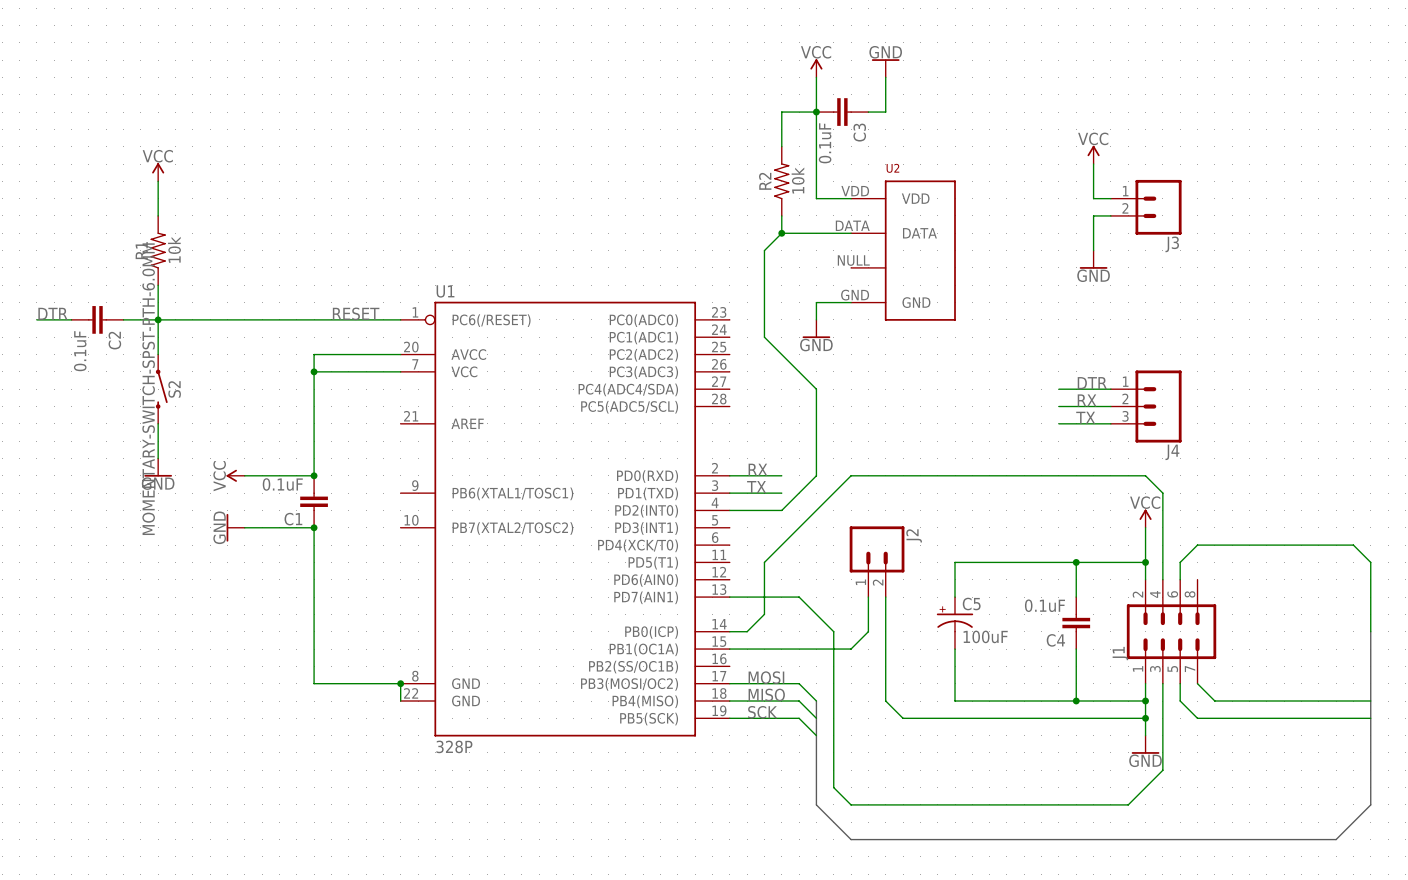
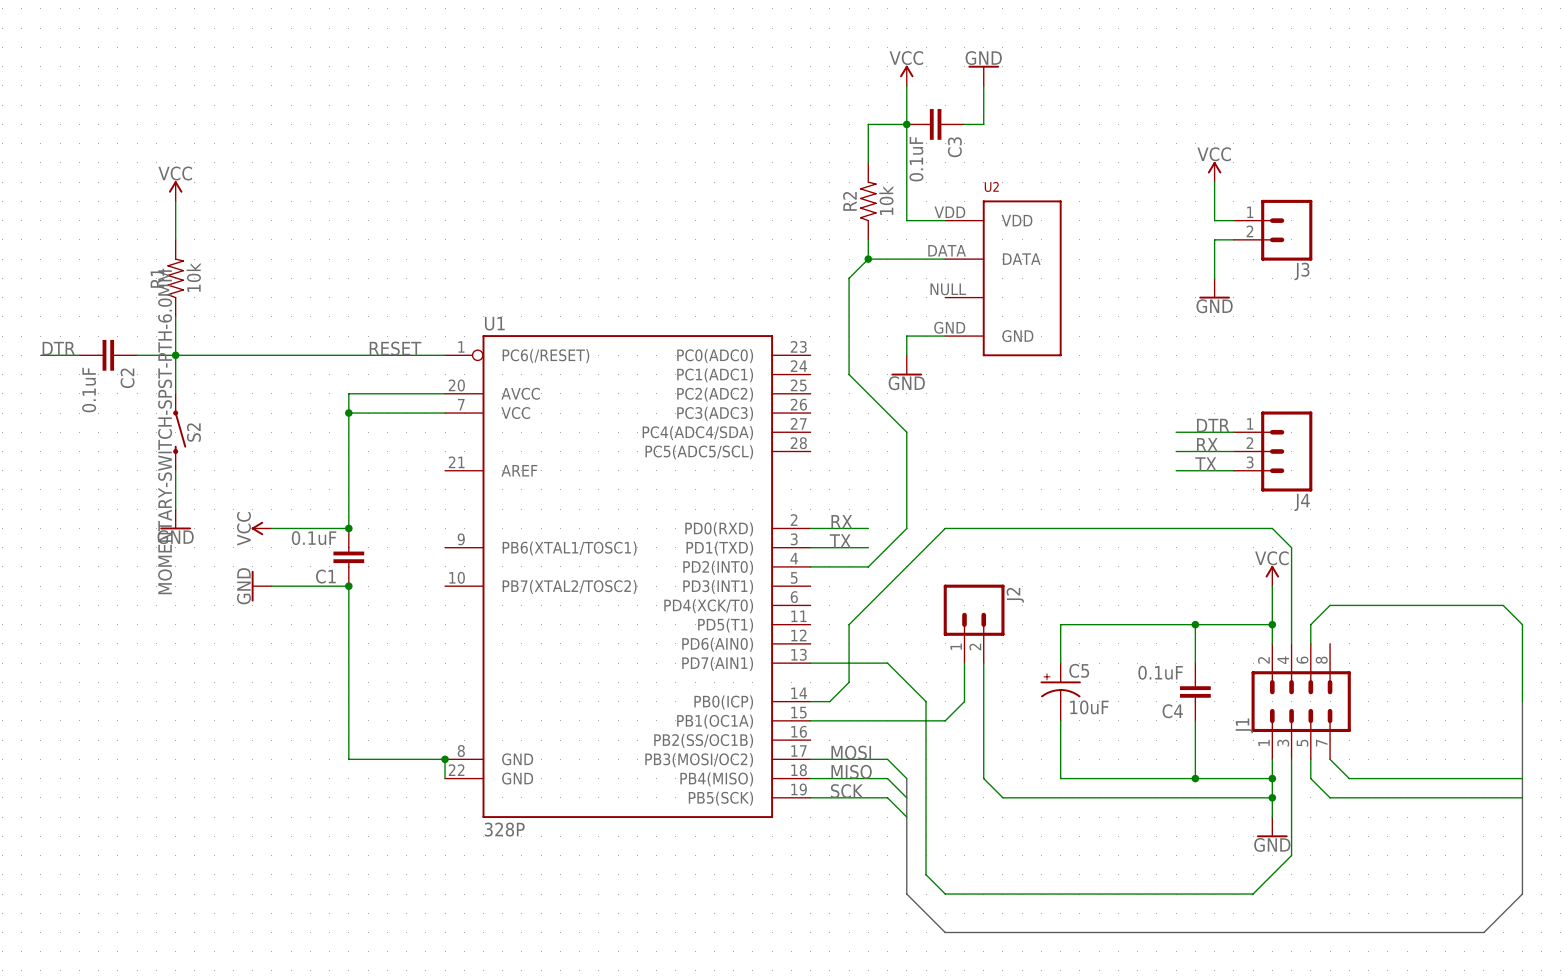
C5 value: 100uF (985, 636) -> 10uF (1089, 707)

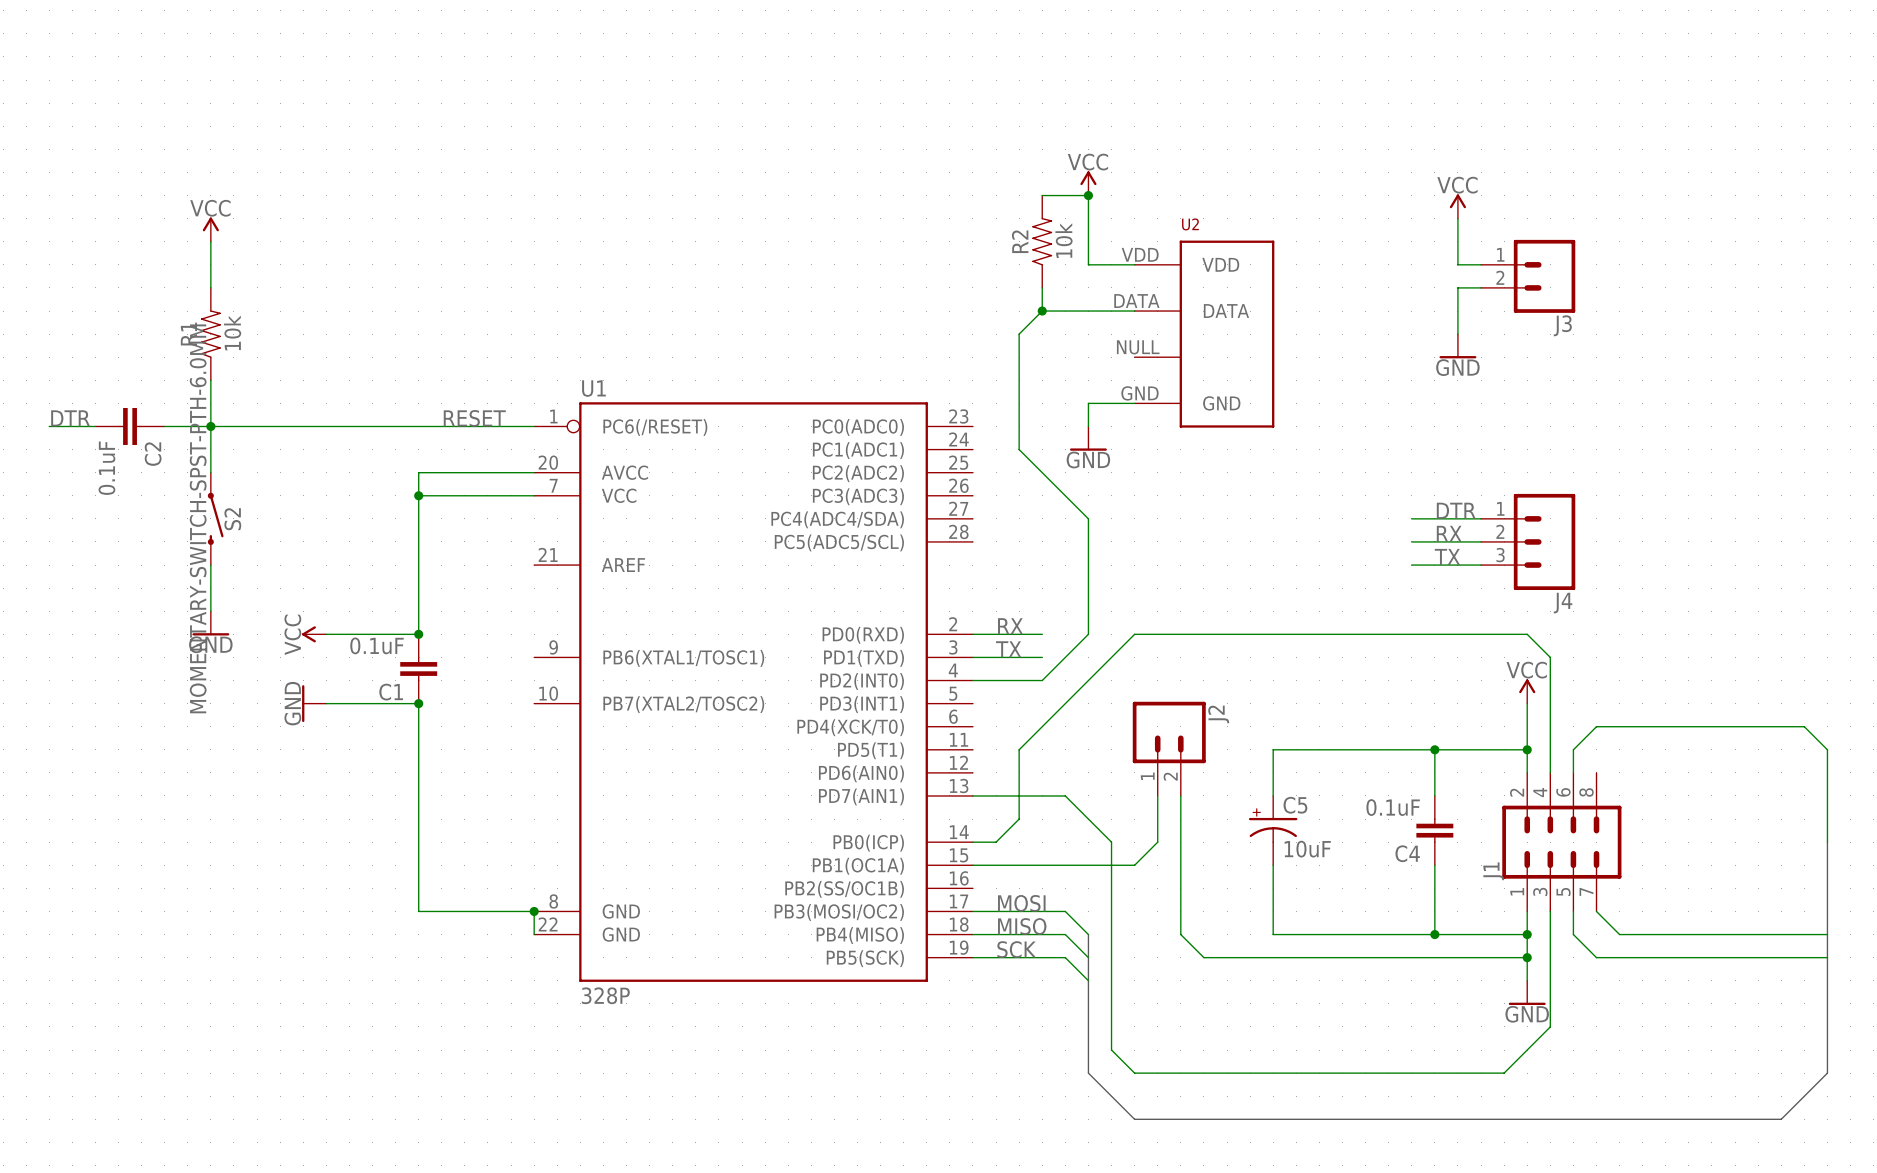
power symbol position: VCC (906, 75) -> VCC (1088, 183)
power symbol: GND (983, 75) -> none
wire: (906, 85) (906, 162) -> none
wire: (983, 85) (983, 124) (964, 124) -> none
wire: (906, 124) (868, 124) (868, 162) -> (1088, 195) (1042, 195)
junction position: (906, 124) -> (1088, 195)
C3: 0.1uF (935, 124) -> none

